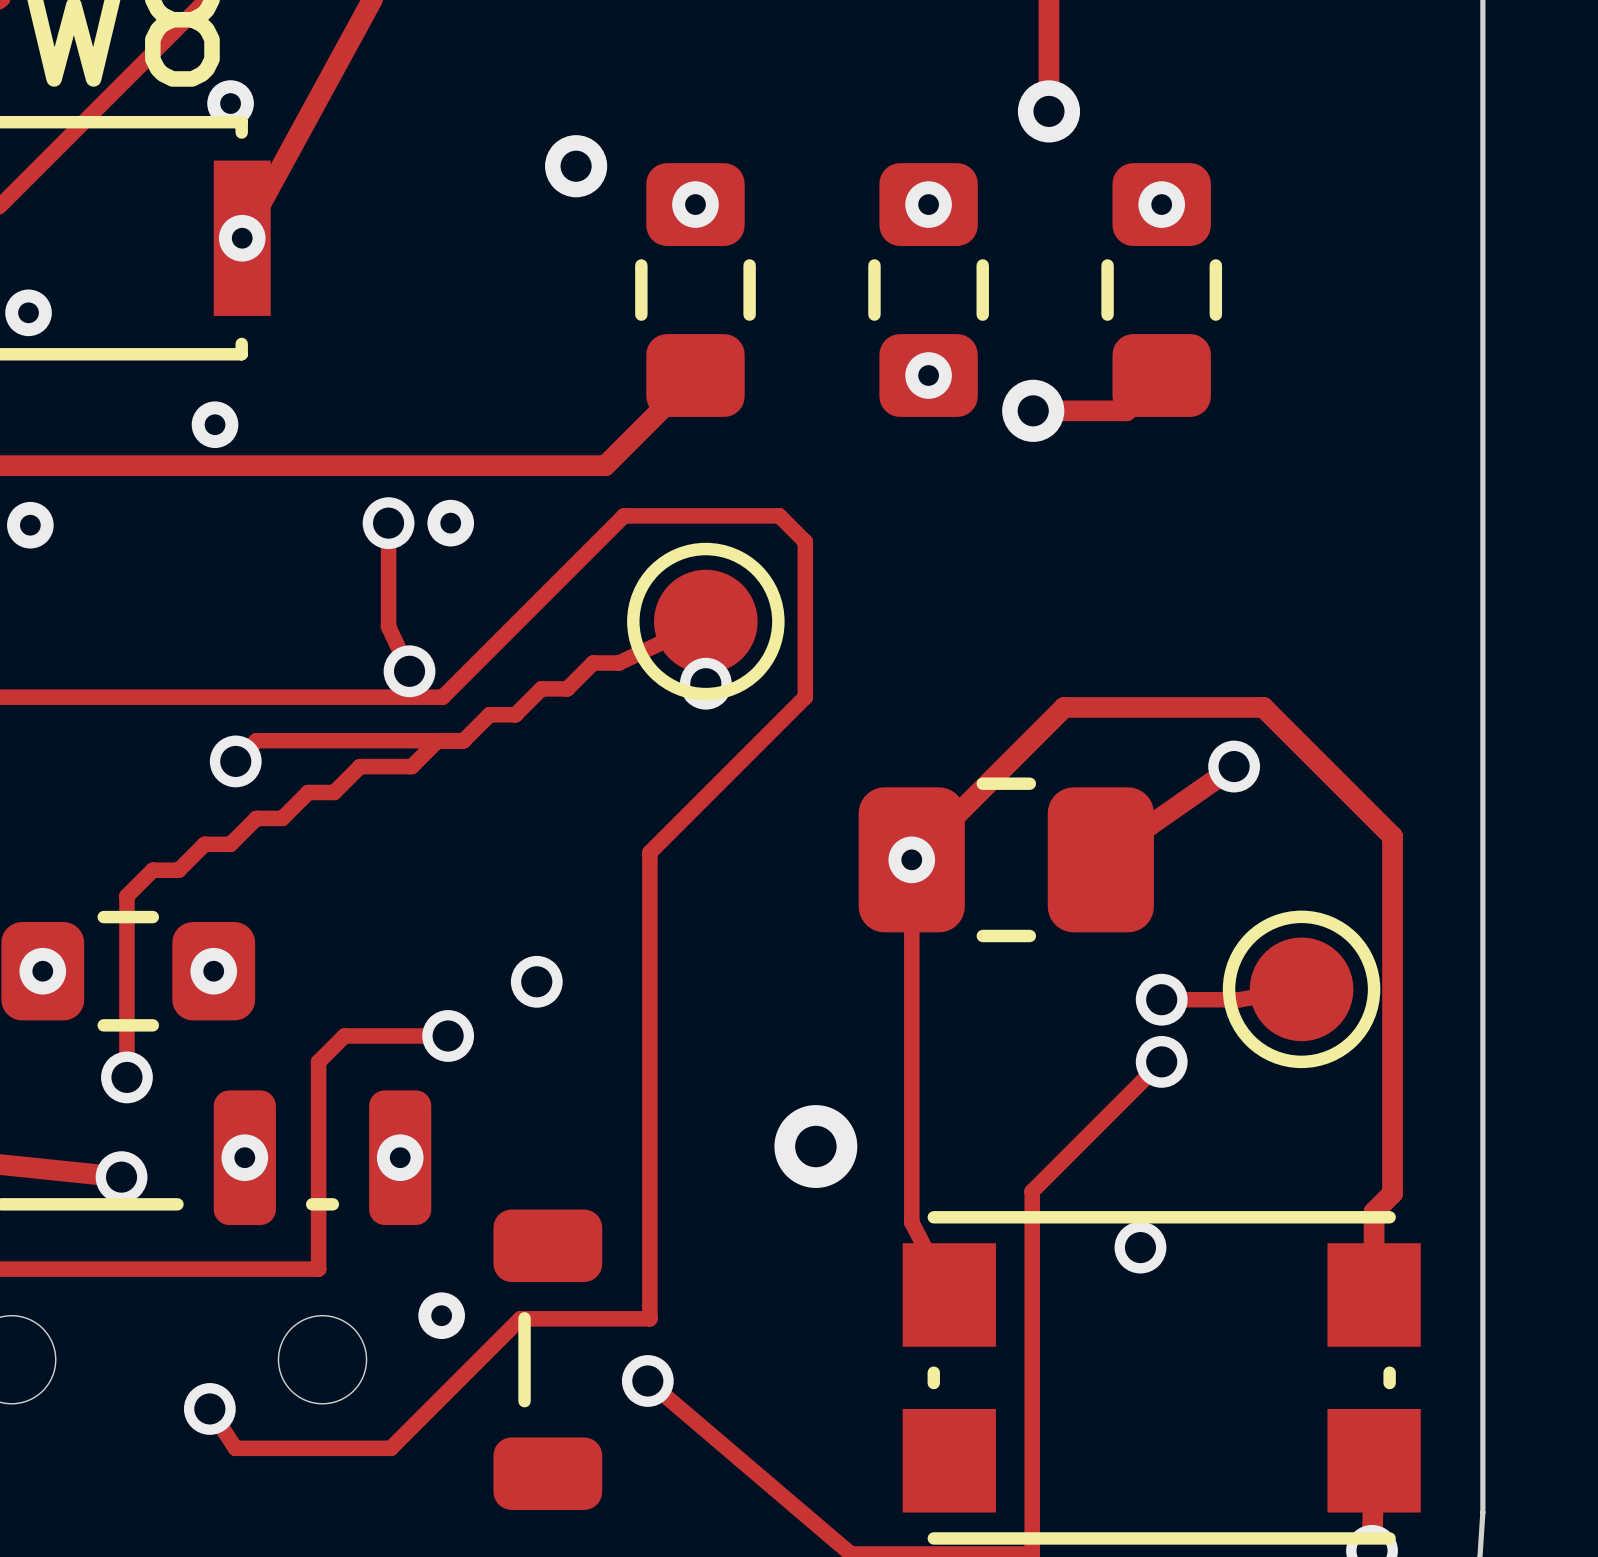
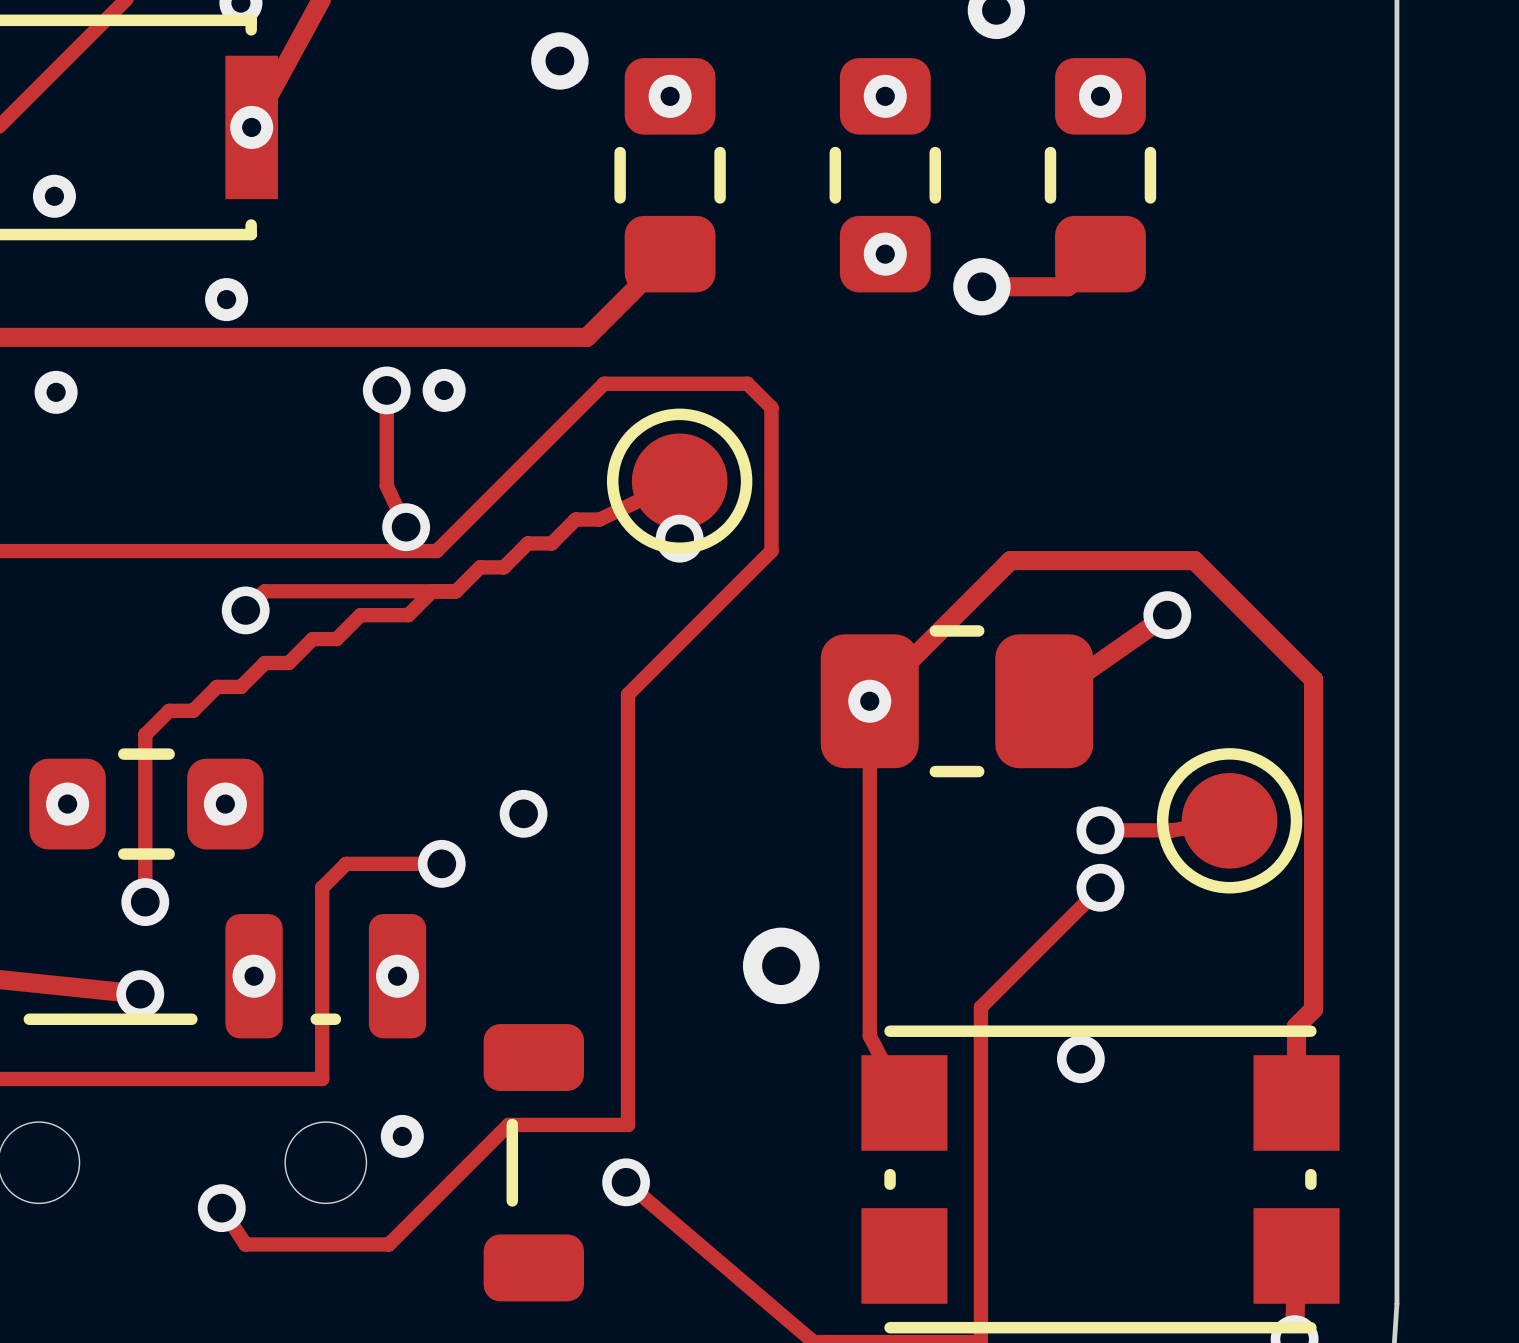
via position: (441, 1315) -> (402, 1136)

